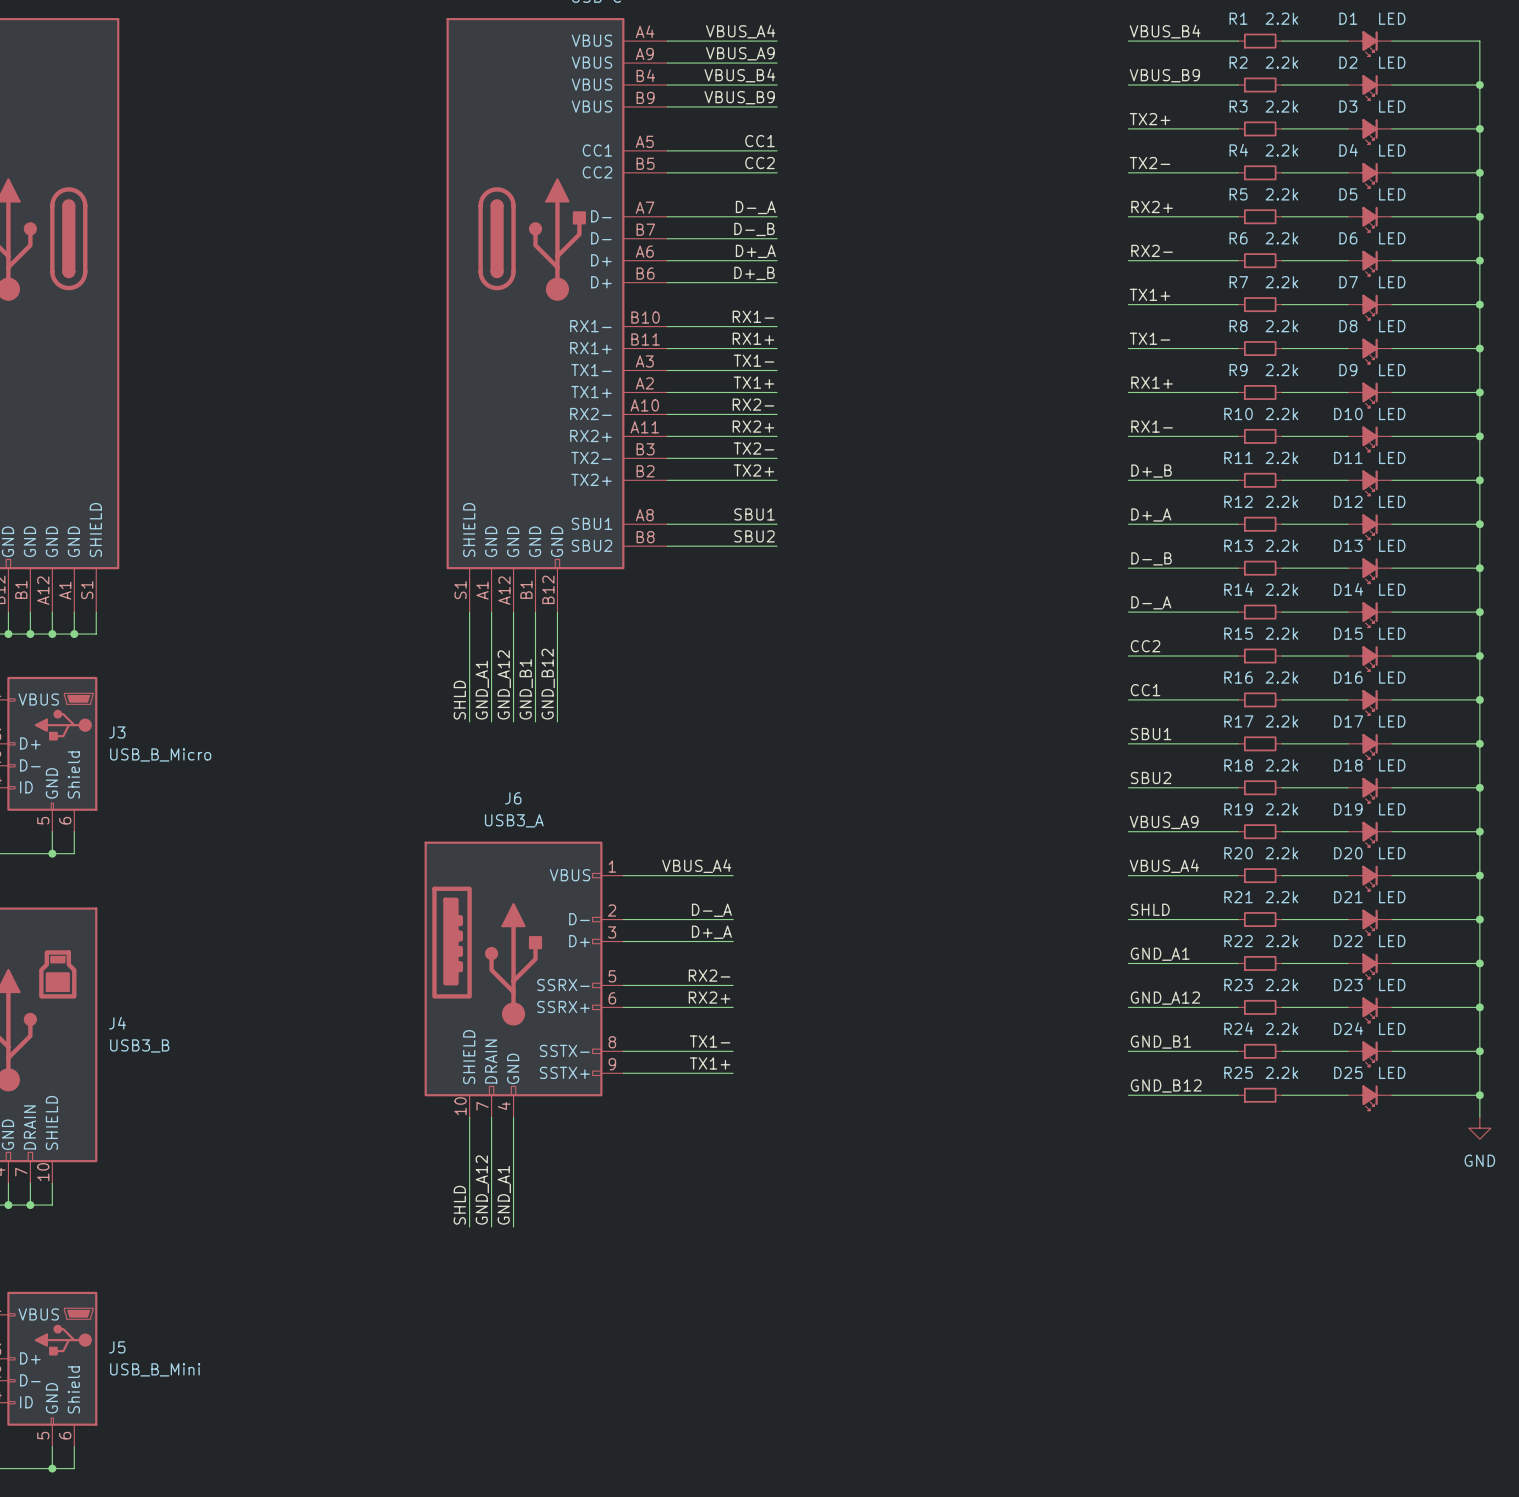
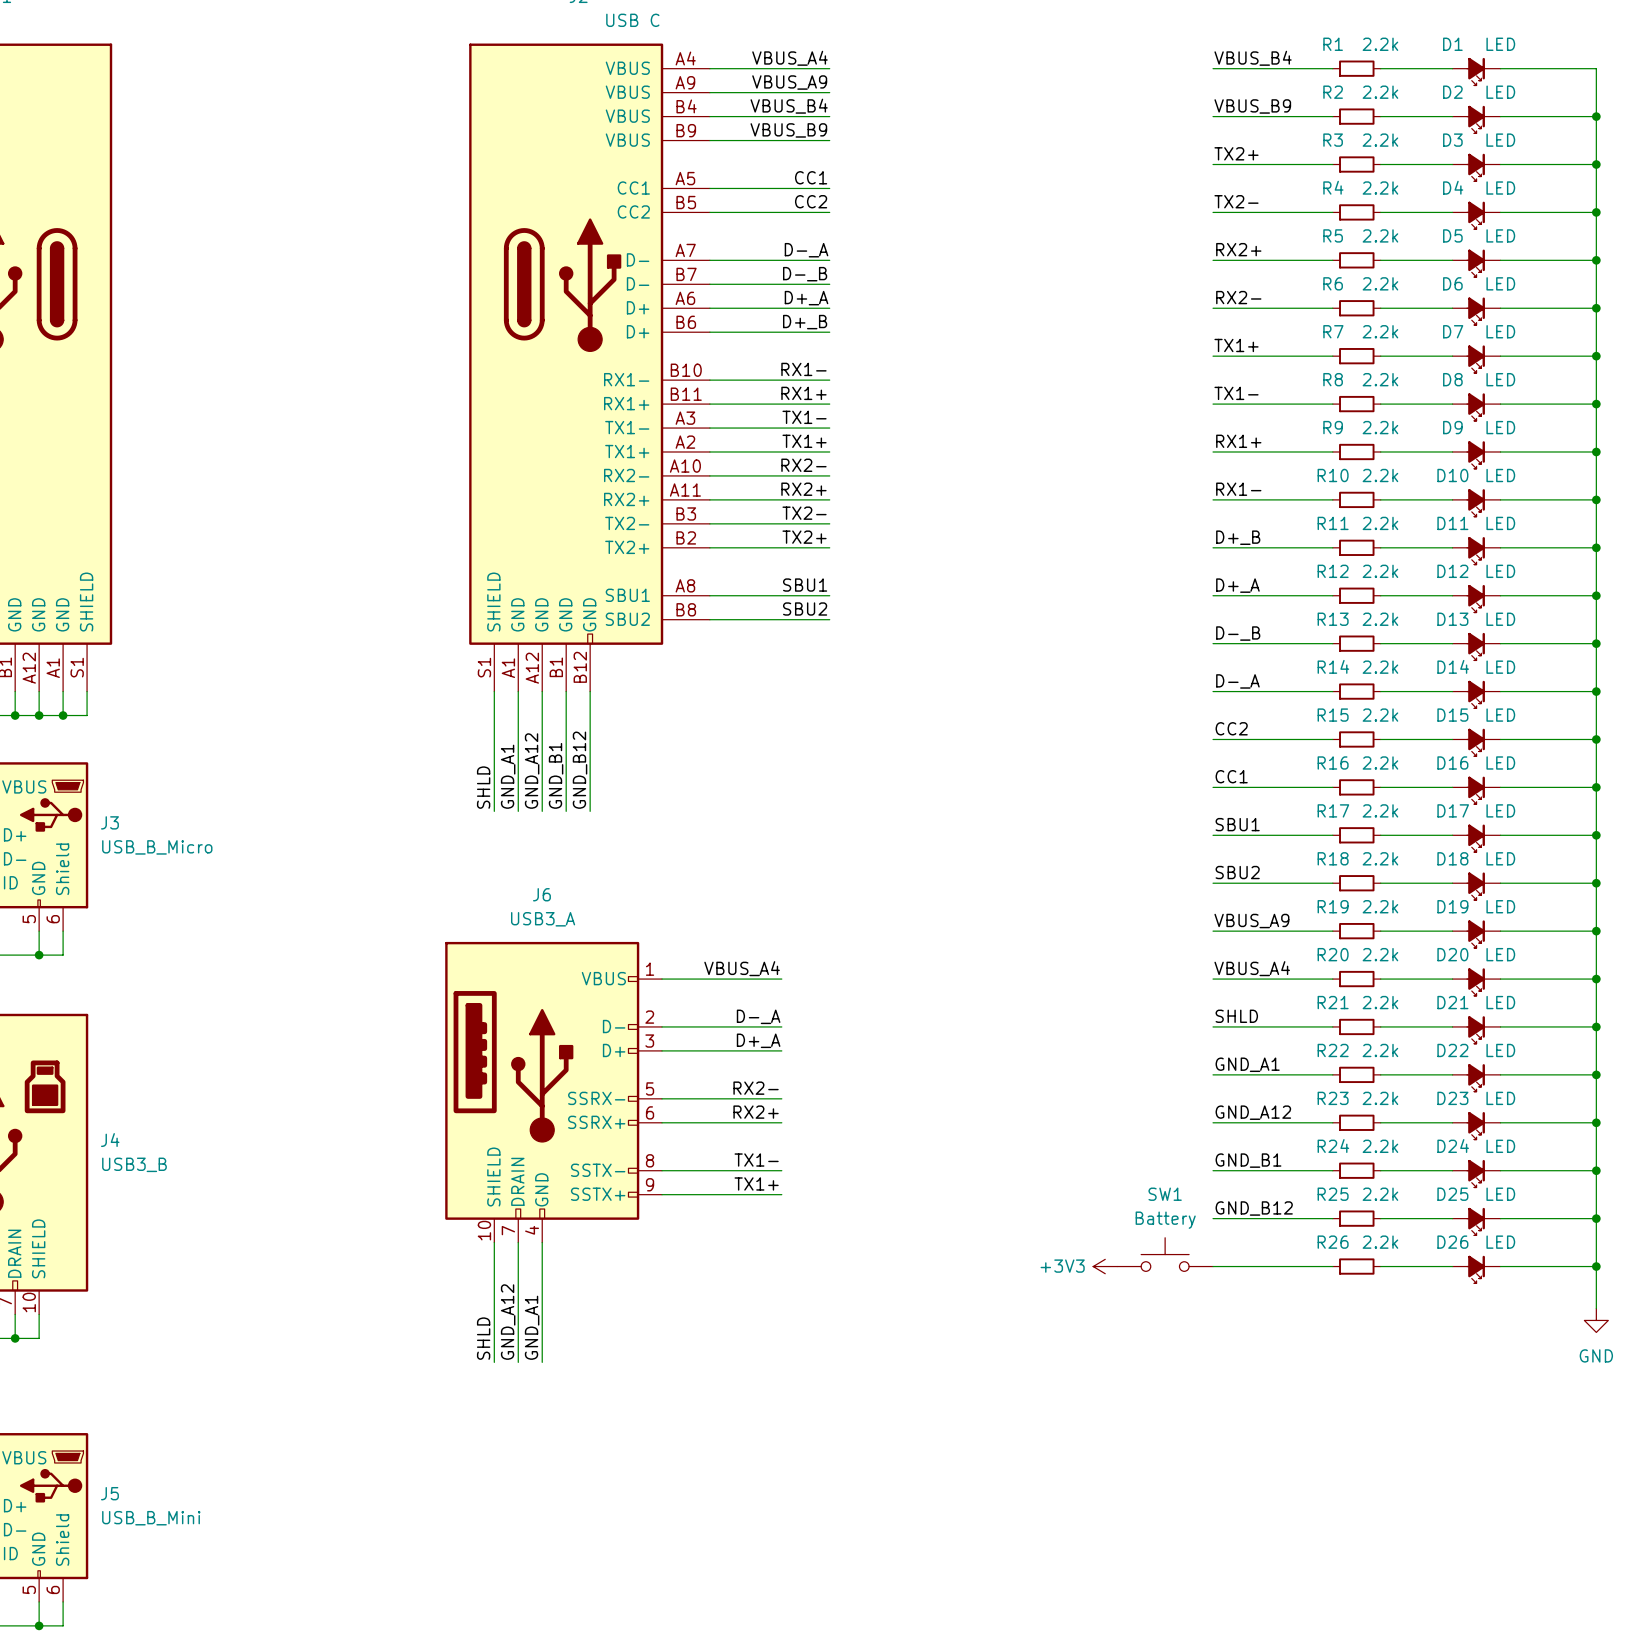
wire: none -> (1596, 1242) (1596, 1308)
SW1: none -> Battery (1165, 1254)
power symbol position: GND (1479, 1128) -> GND (1596, 1320)
power symbol: none -> +3V3 (1105, 1266)
wire: none -> (1213, 1266) (1332, 1266)
R26: none -> 2.2k (1356, 1266)
wire: none -> (1380, 1266) (1452, 1266)
wire: none -> (1500, 1266) (1596, 1266)
junction: none -> (1596, 1266)
D26: none -> LED (1476, 1269)

